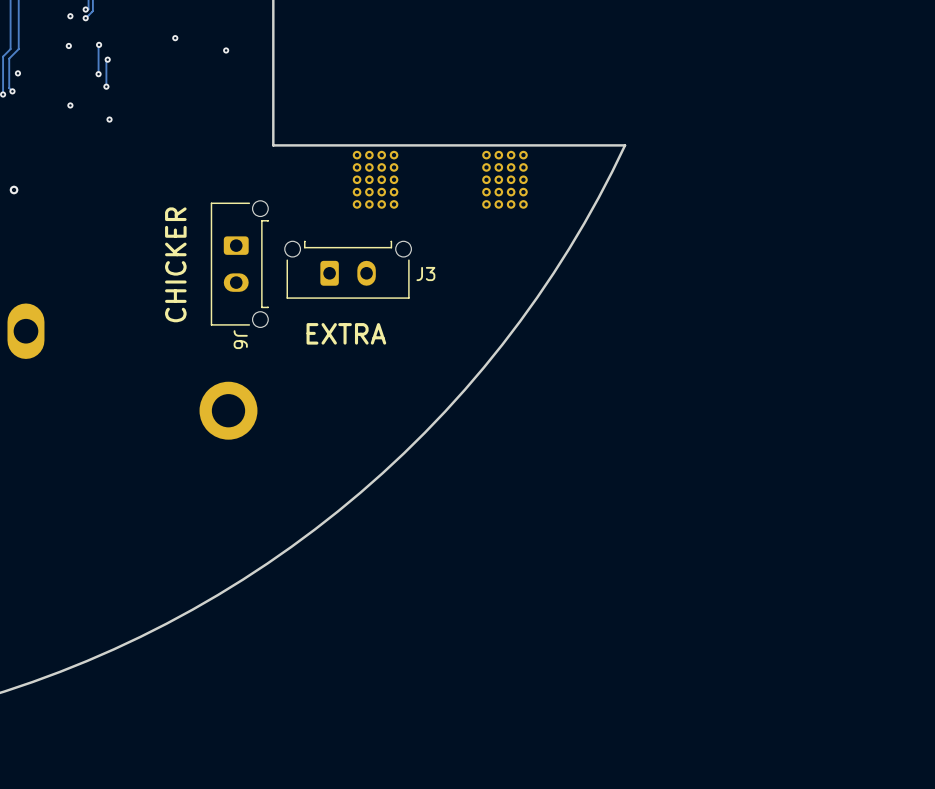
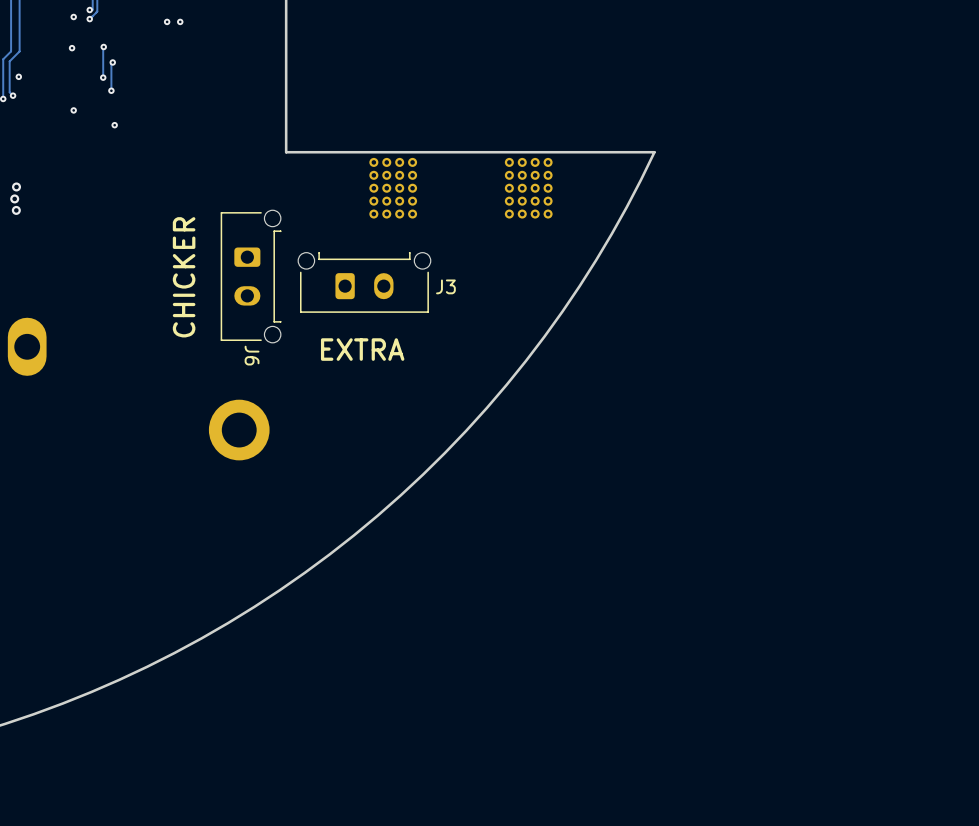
via: none -> (167, 21)
via: none -> (180, 21)
via: (175, 38) -> none
via: (226, 50) -> none
via: none -> (16, 186)
via: none -> (16, 210)

